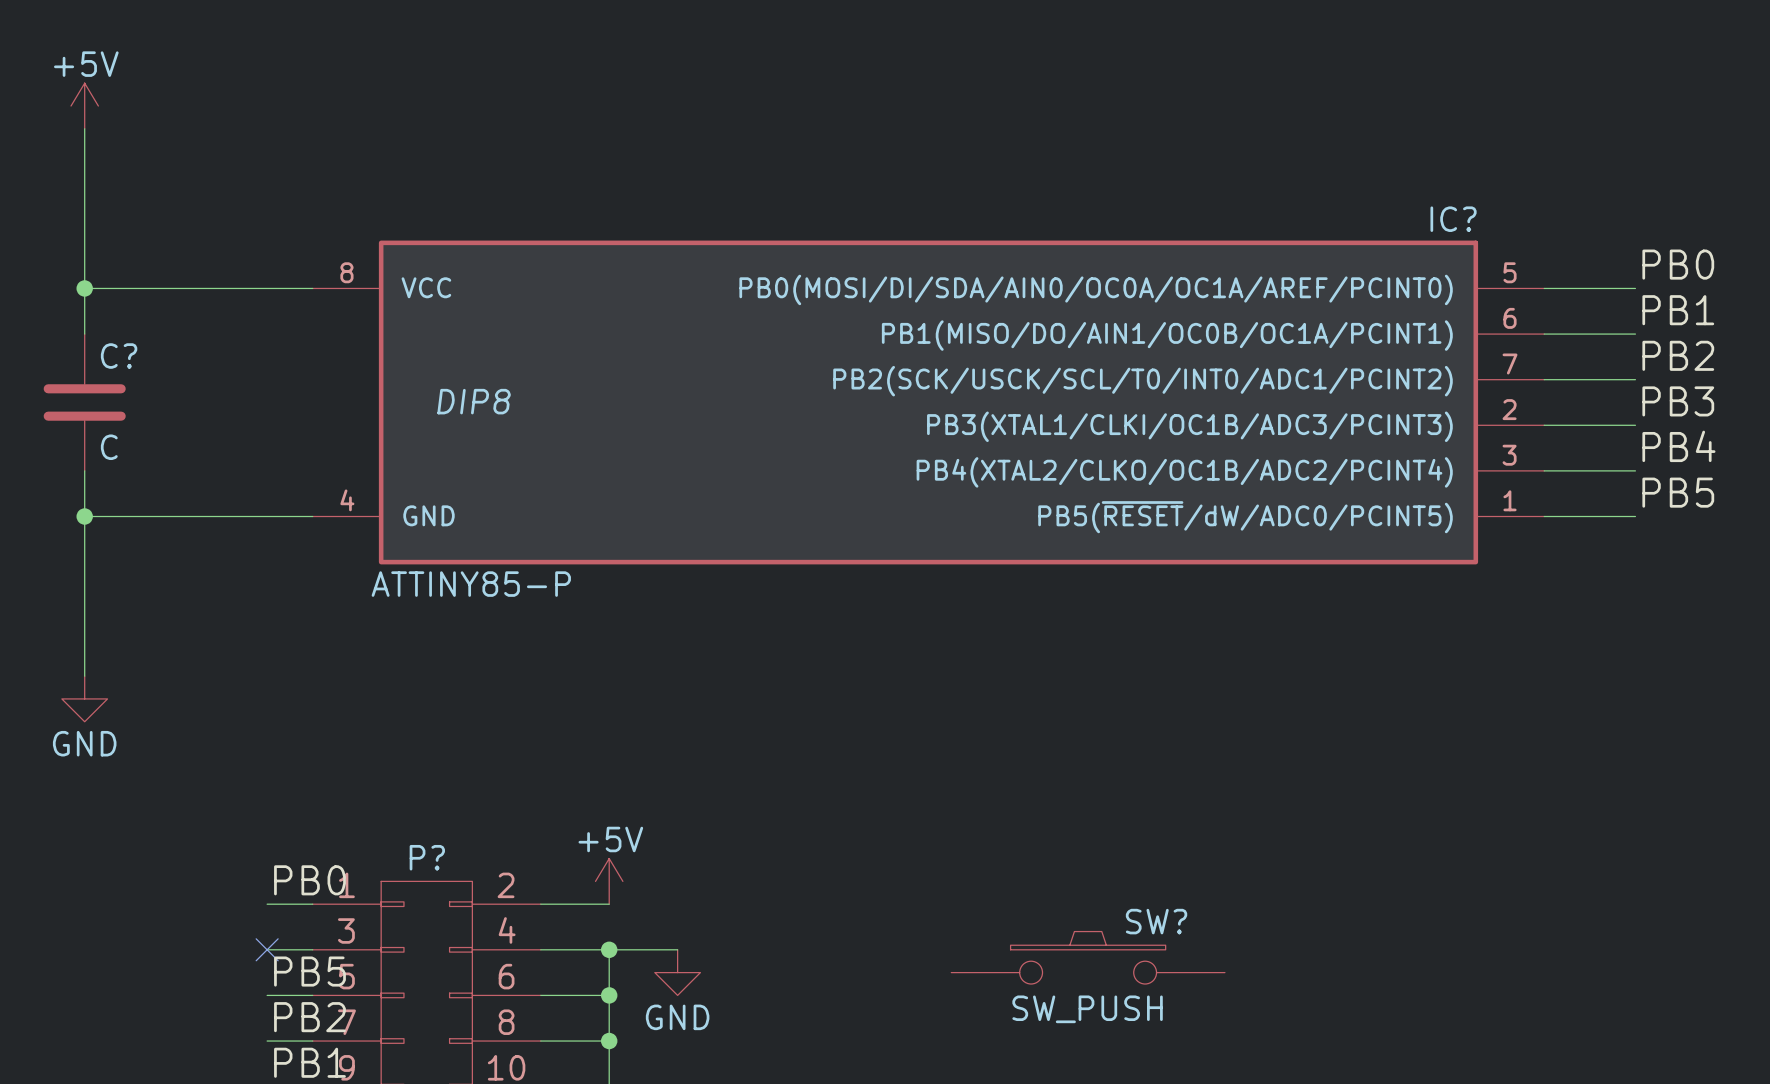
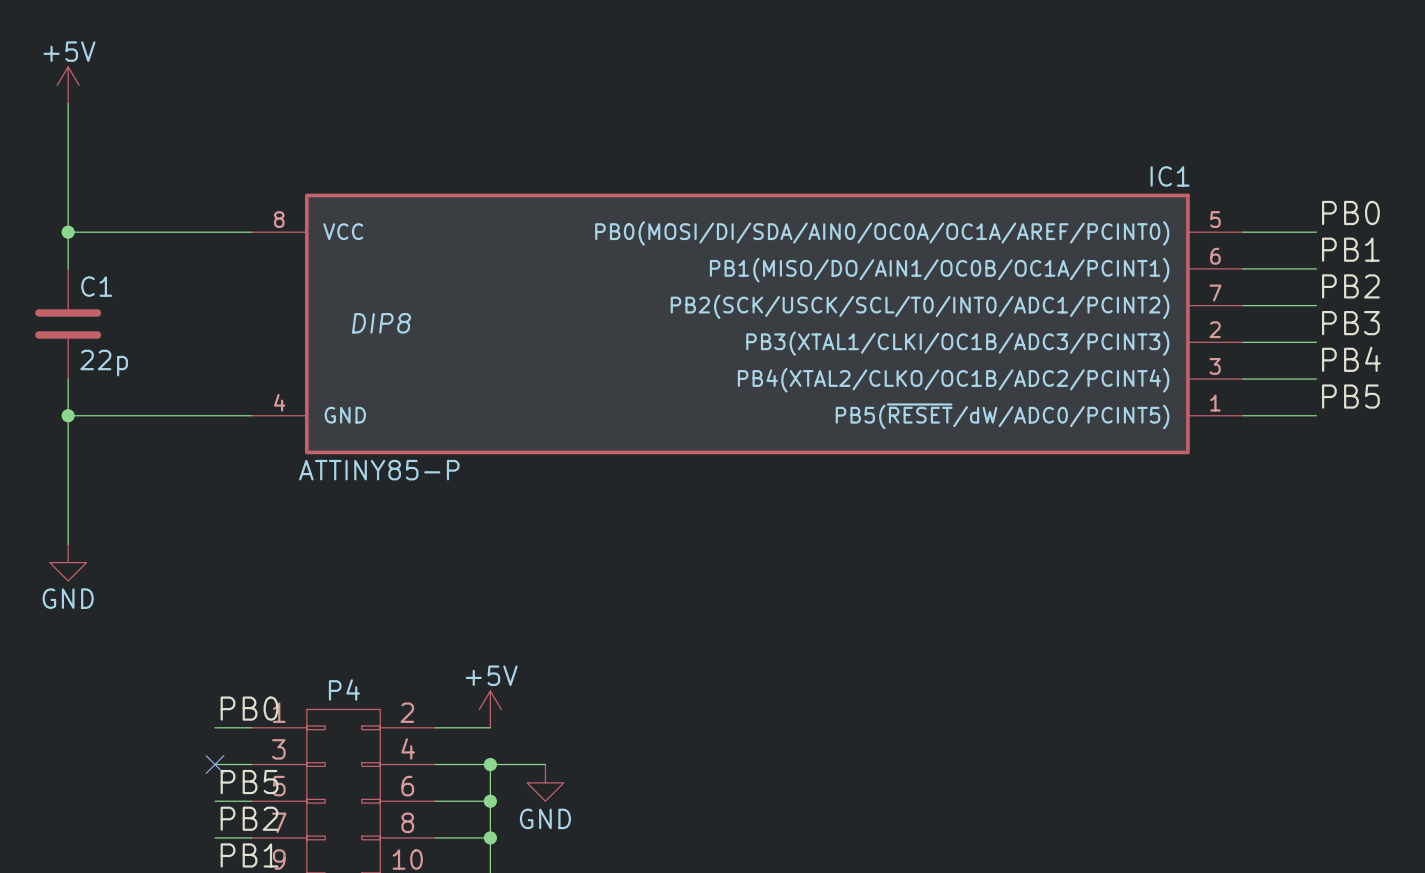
IC? name: IC? (1453, 219) -> IC1 (1170, 176)
C? name: C? (119, 356) -> C1 (96, 286)
C? value: C (109, 447) -> 22p (104, 363)
P? name: P? (427, 857) -> P4 (344, 689)
SW?: SW_PUSH (1088, 957) -> none

